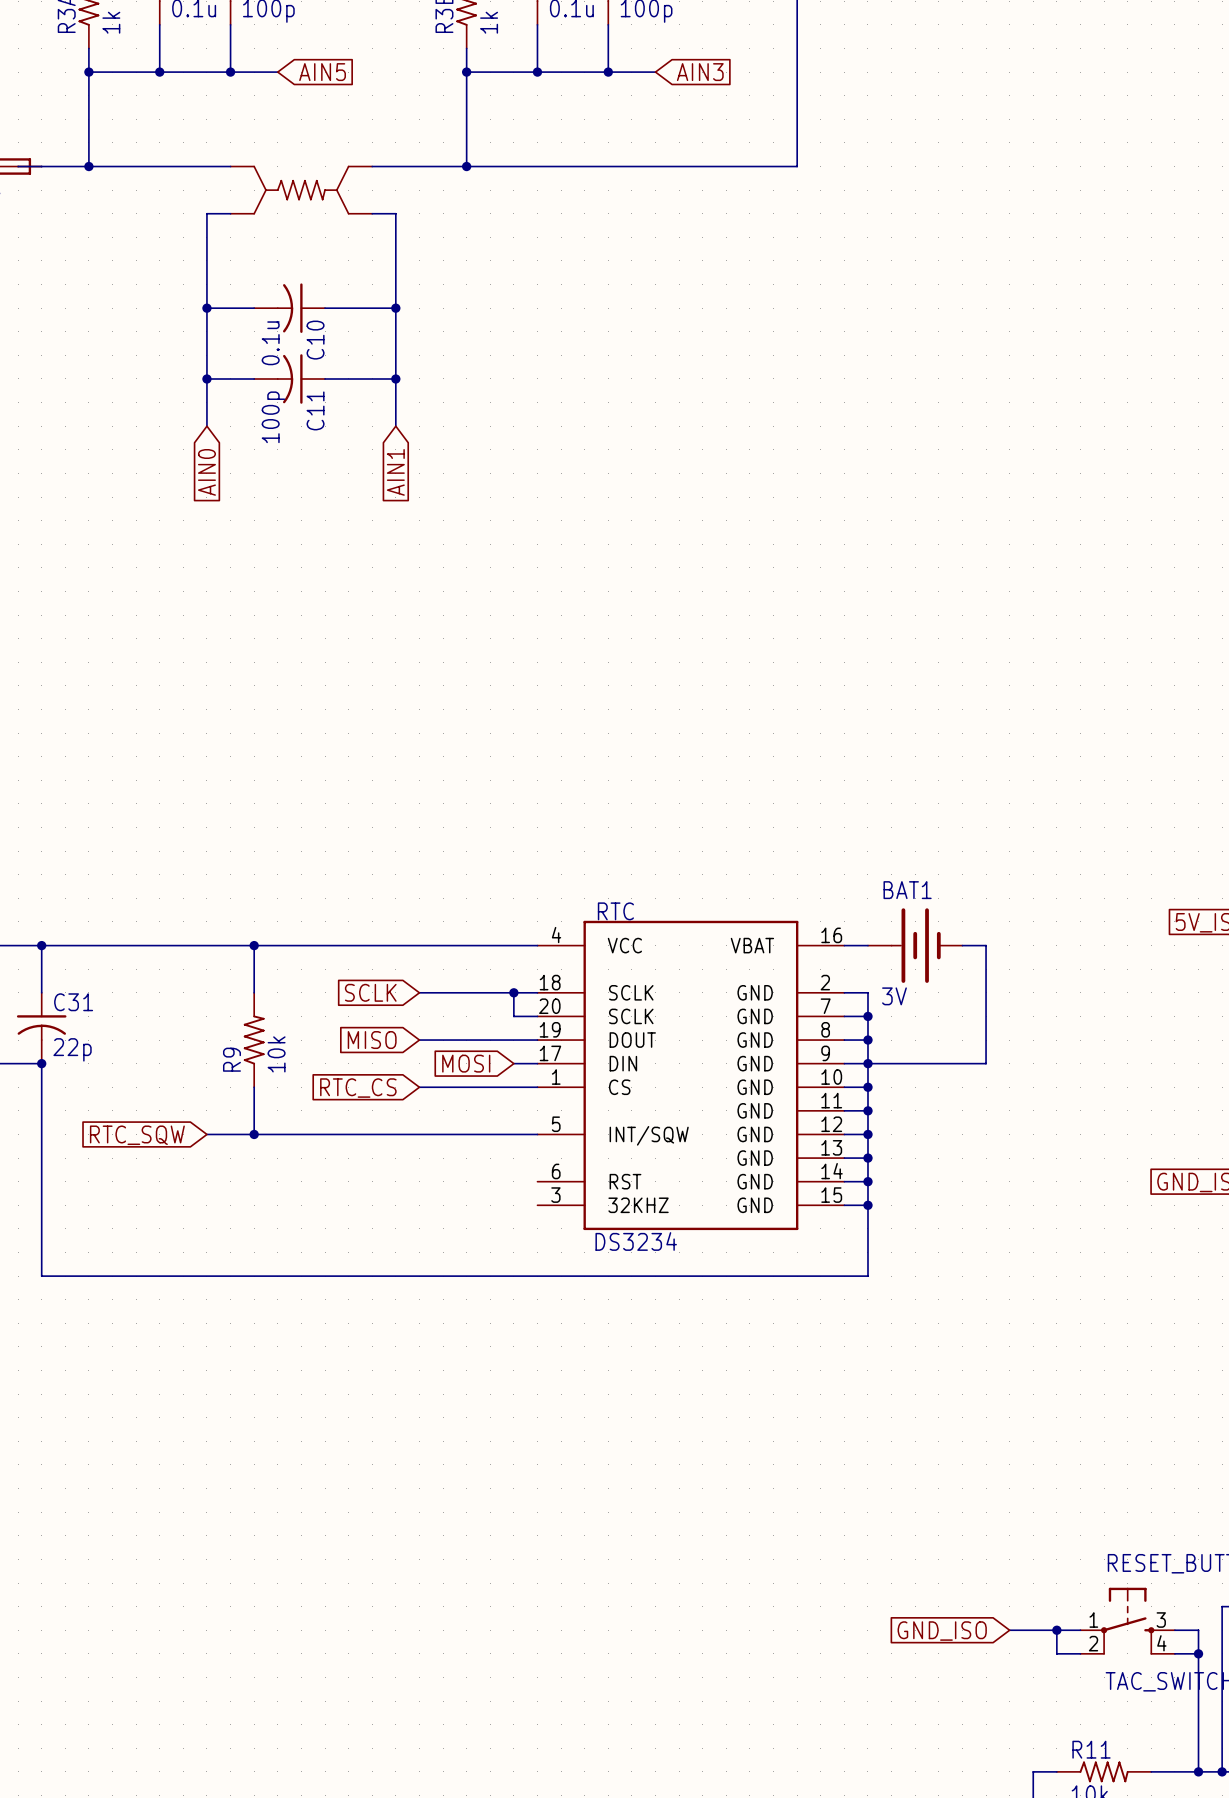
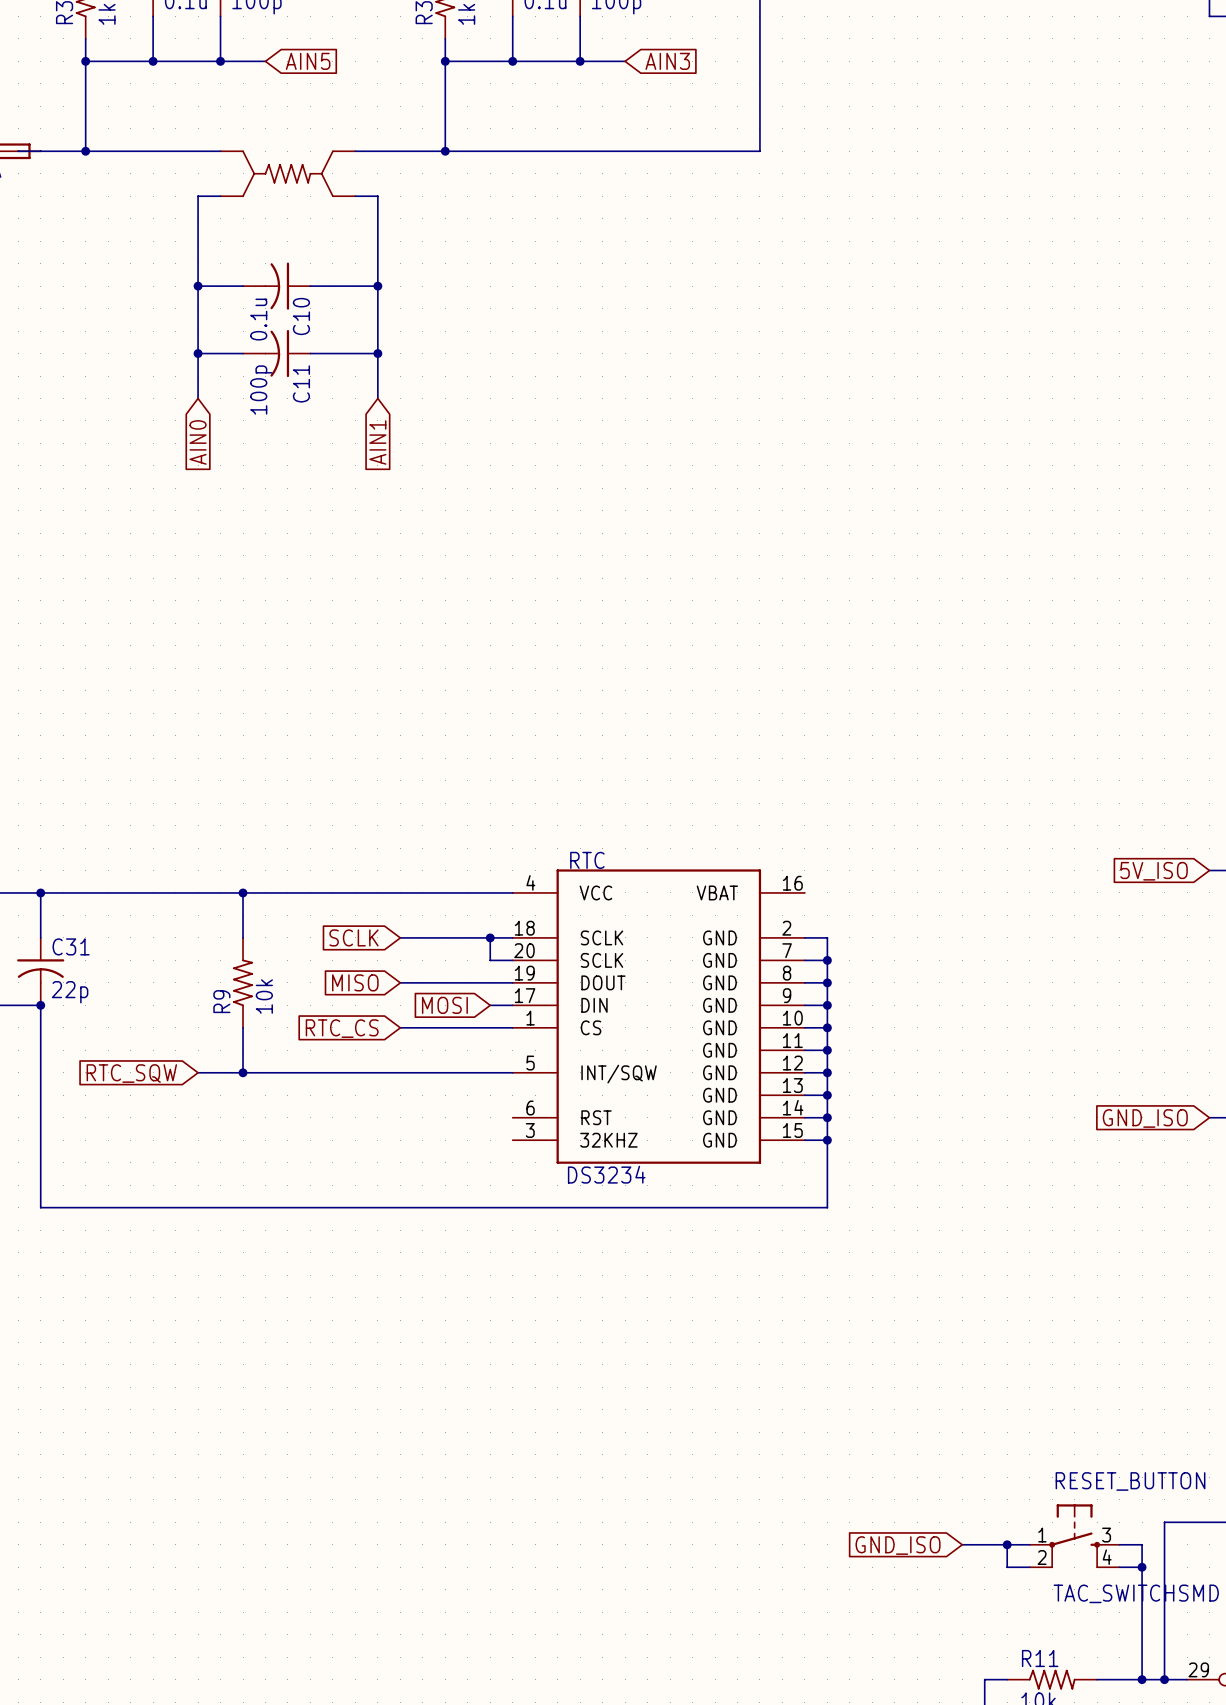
wire: (844, 945) (867, 945) -> none
BAT1: 3V (915, 945) -> none
wire: (962, 945) (986, 945) (986, 1063) (867, 1063) -> none

